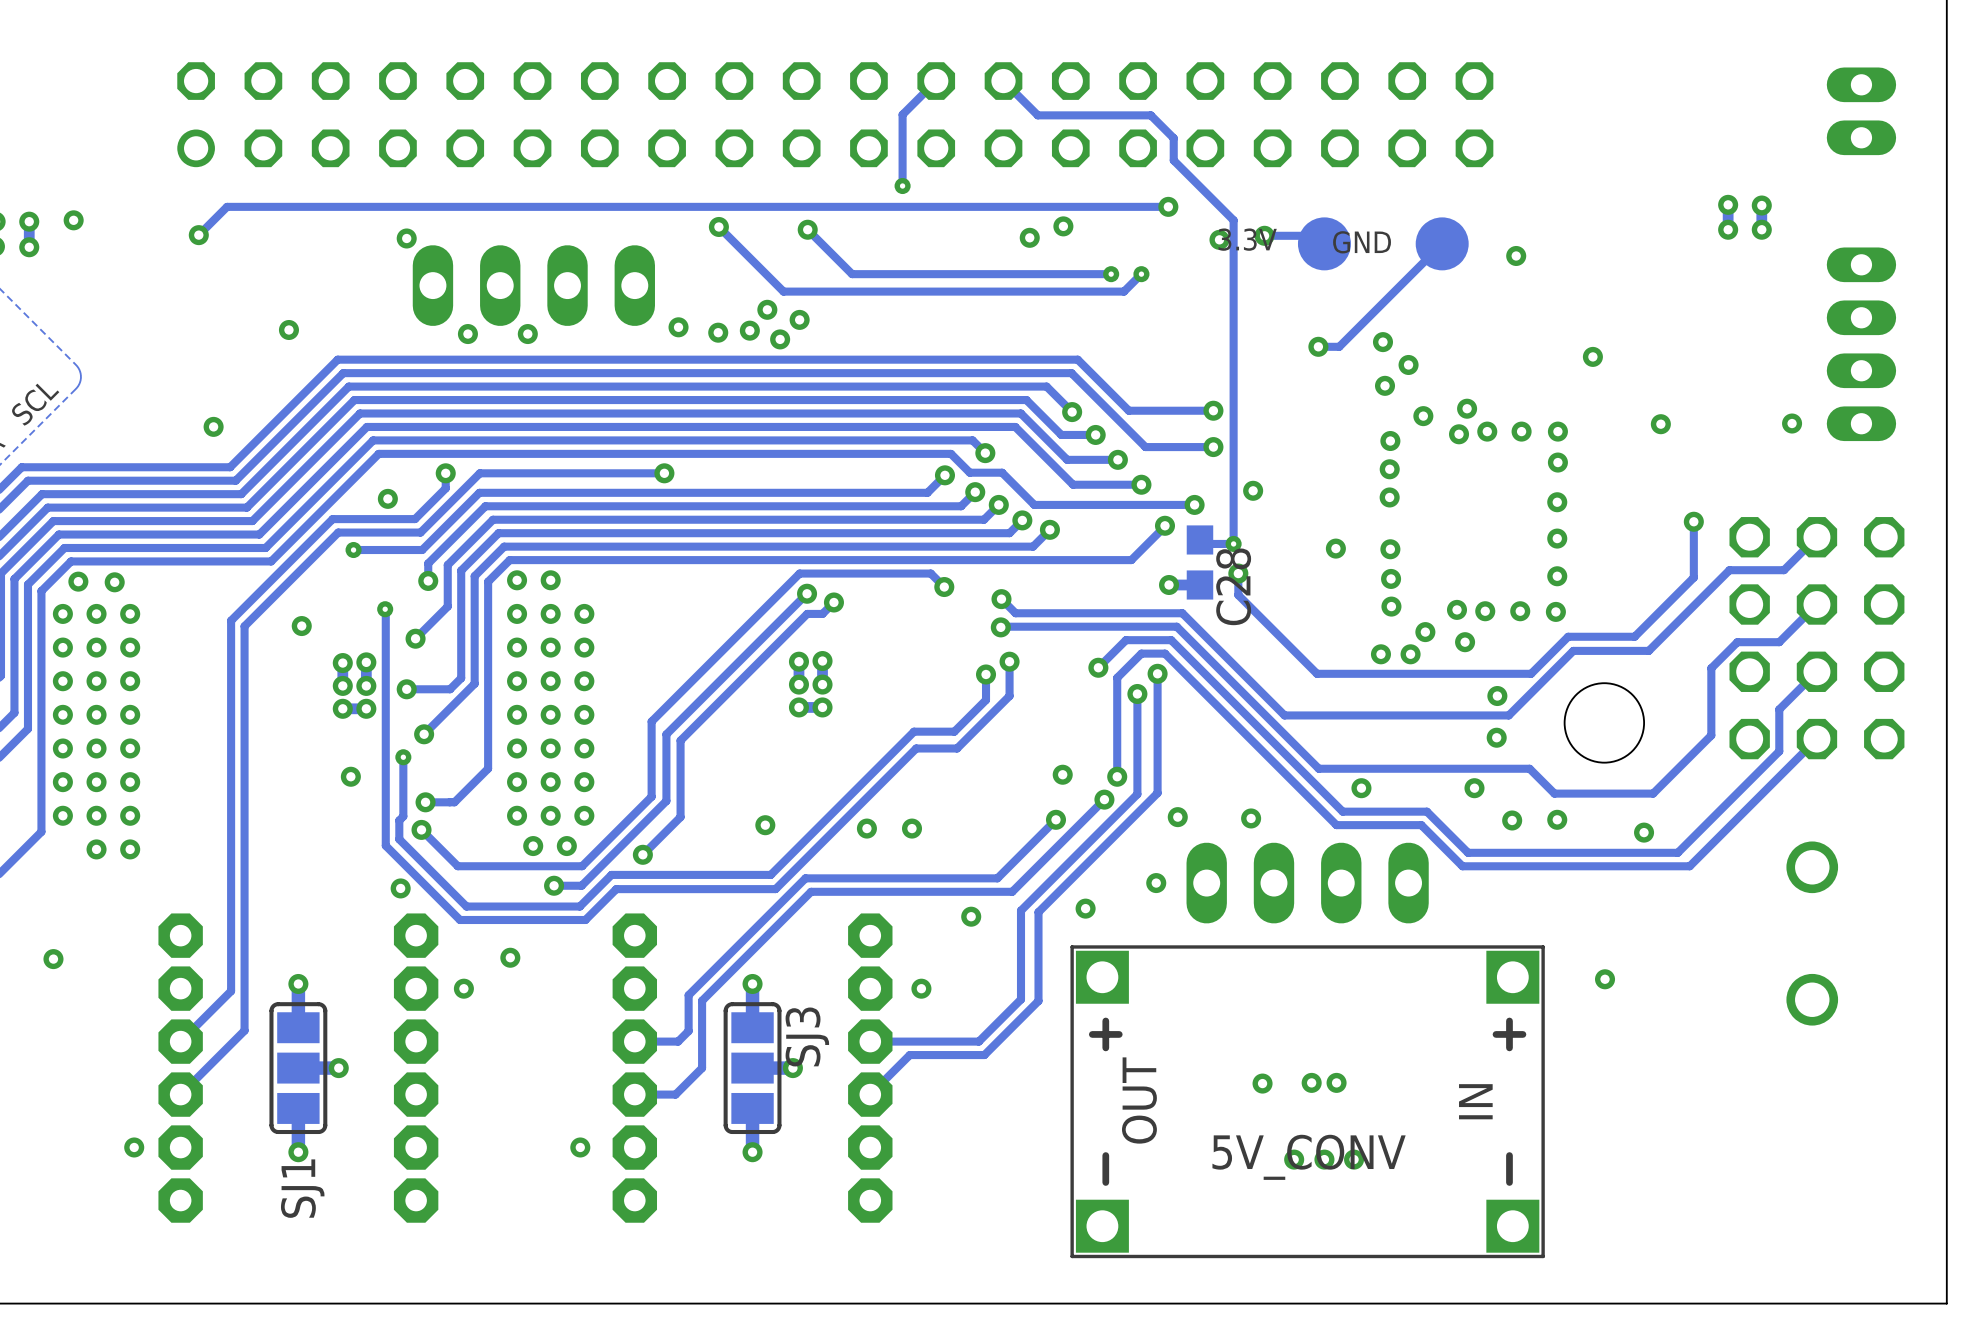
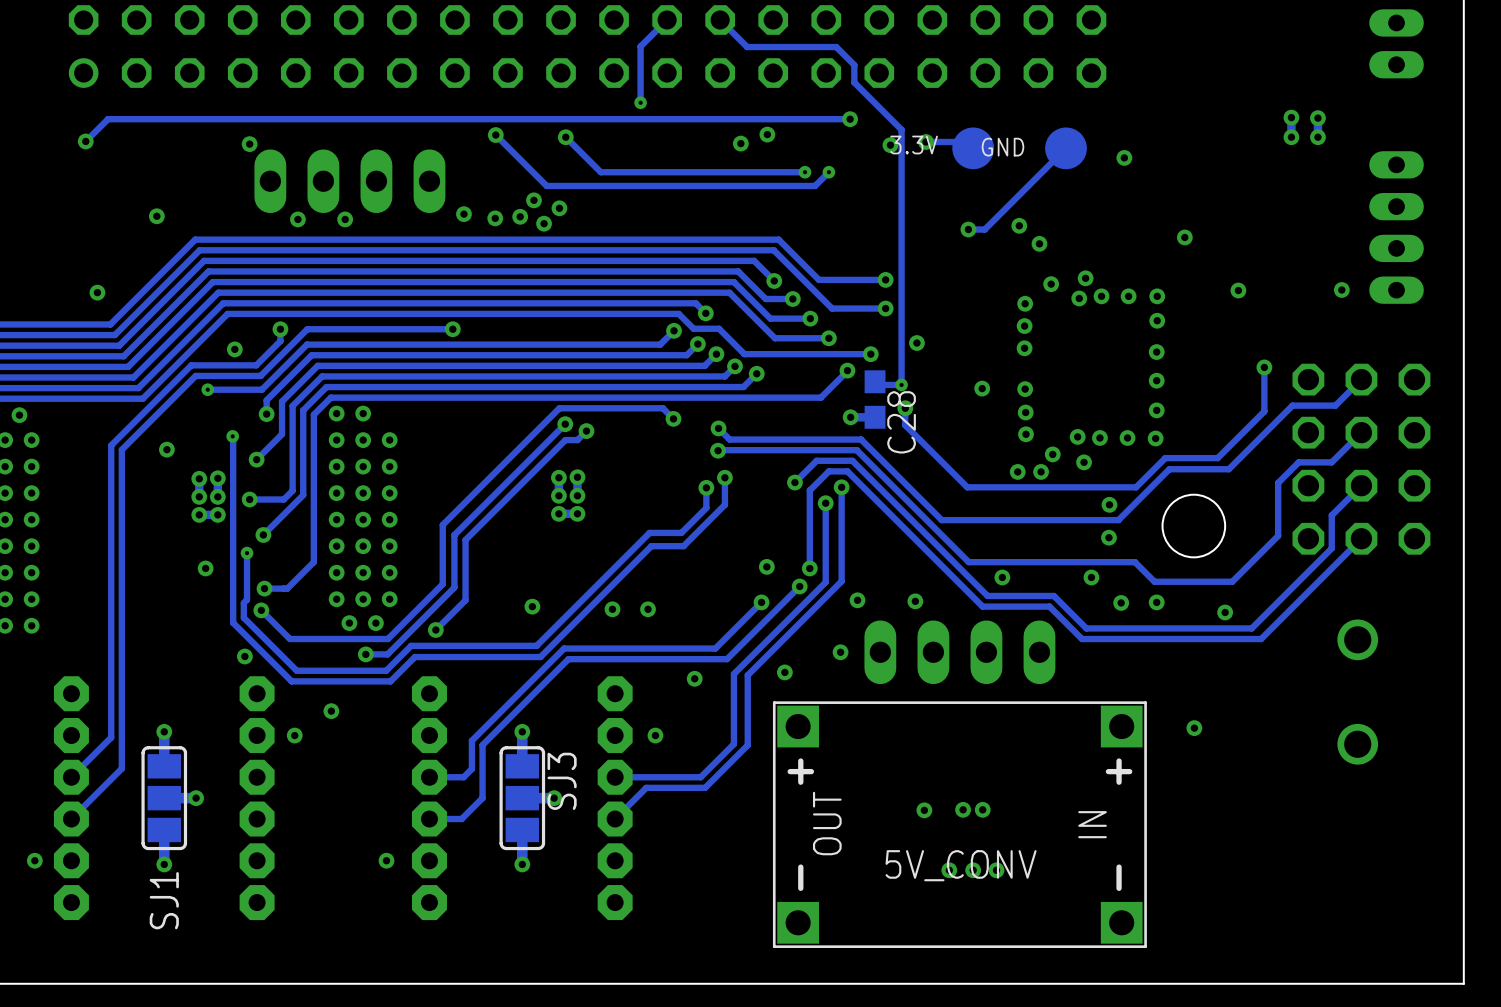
via: (1385, 385) -> none

